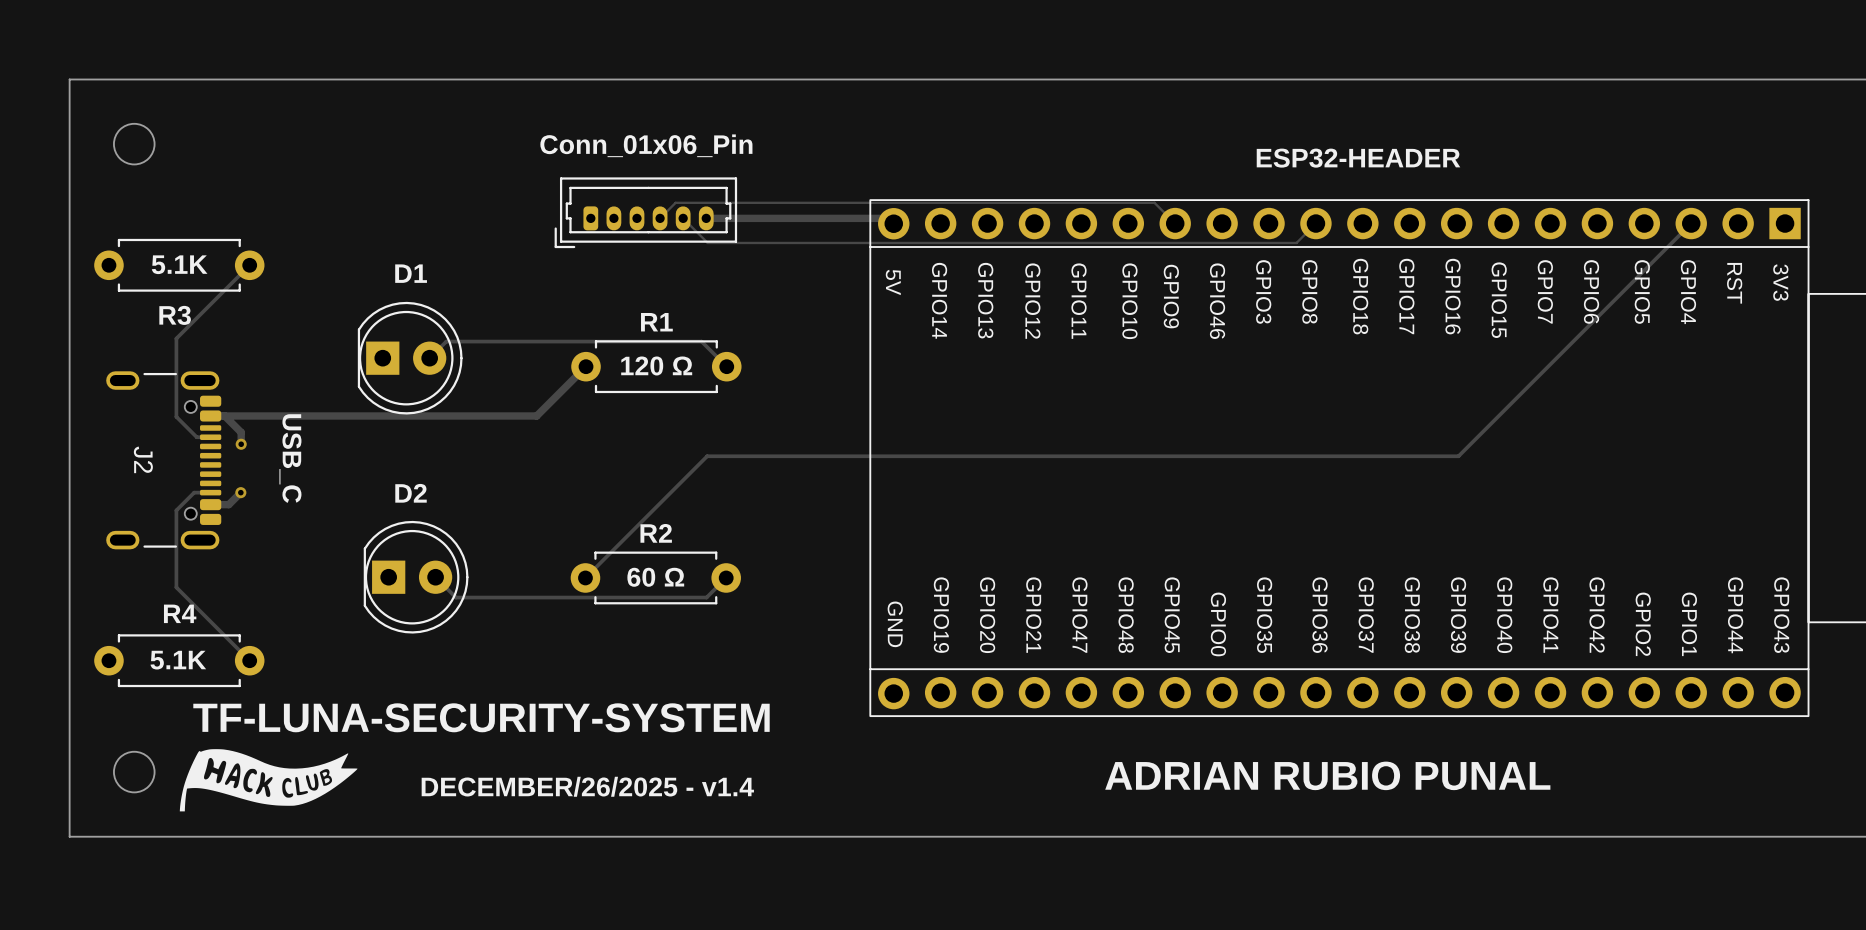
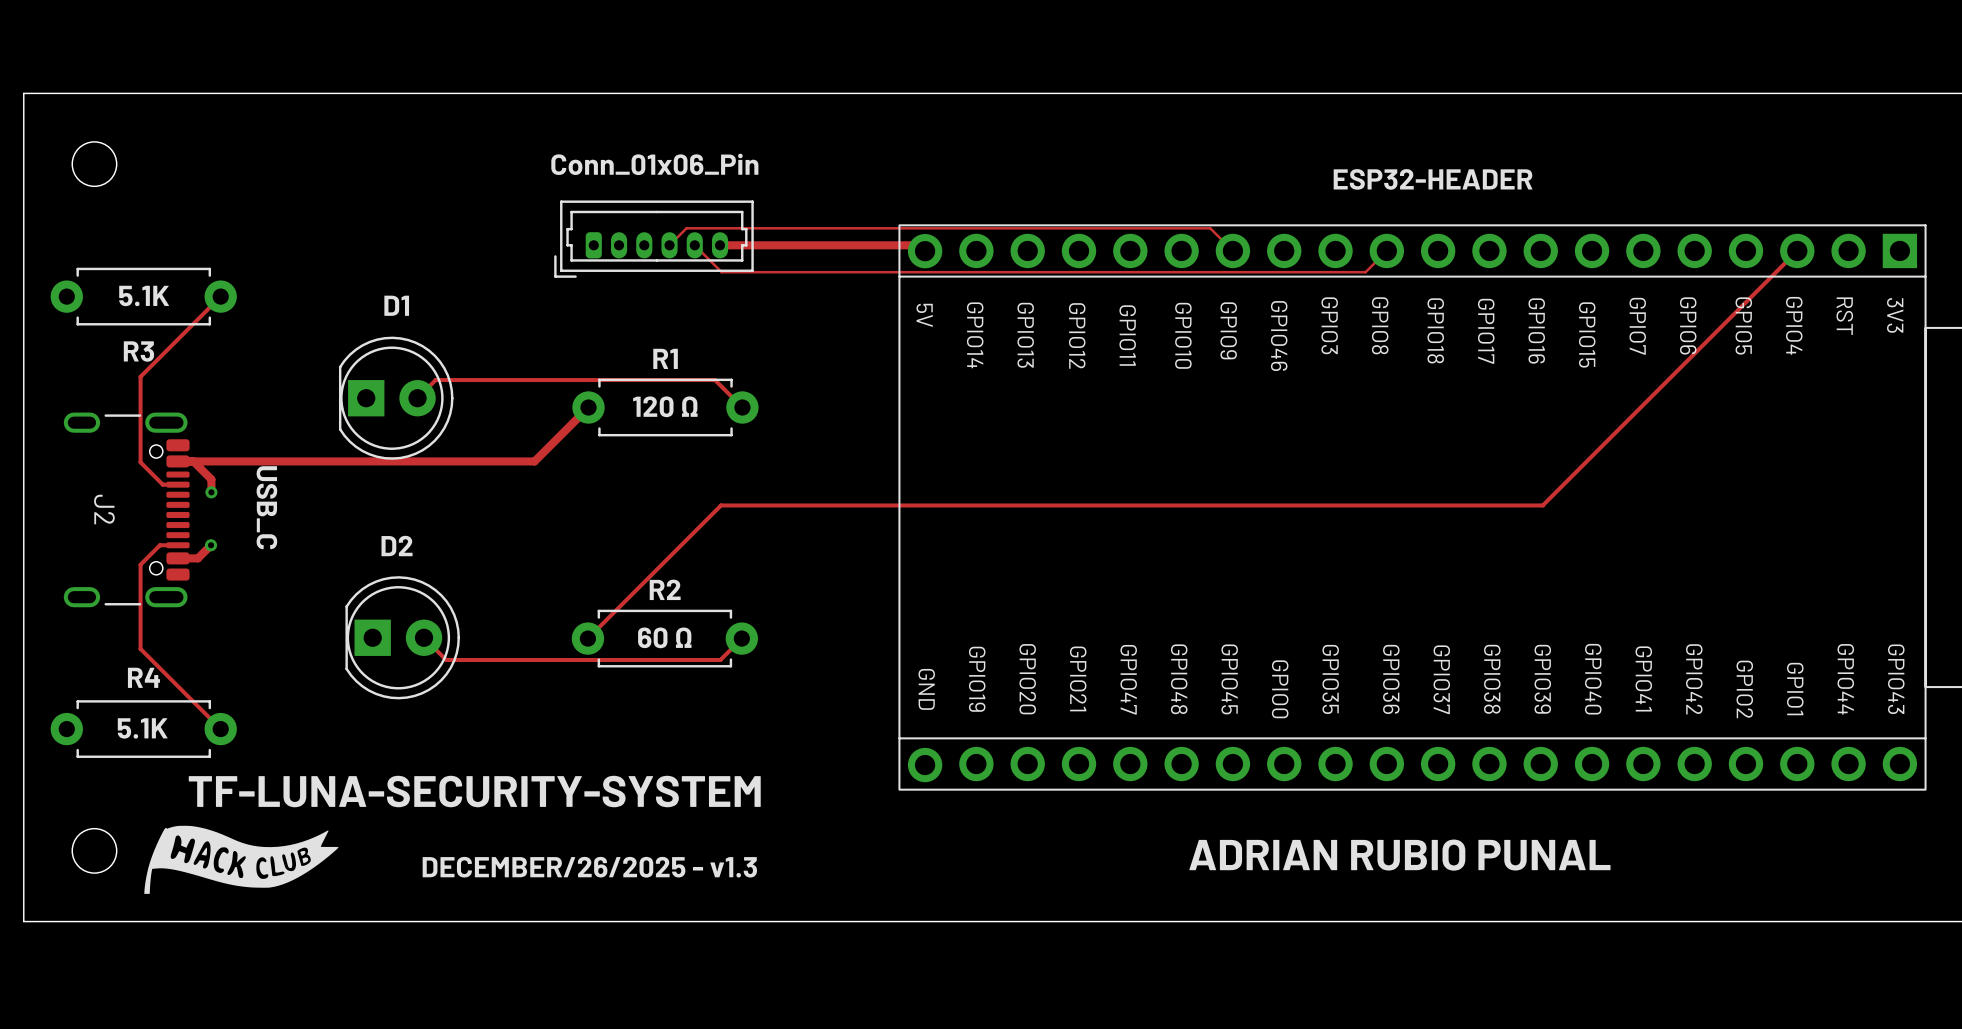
text: DECEMBER/26/2025 - v1.4 (587, 786) -> DECEMBER/26/2025 - v1.3 (589, 867)

